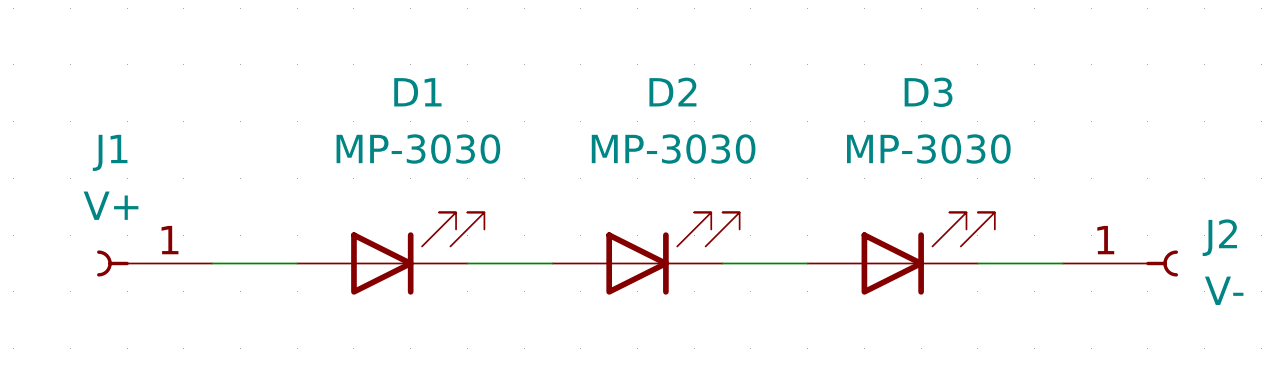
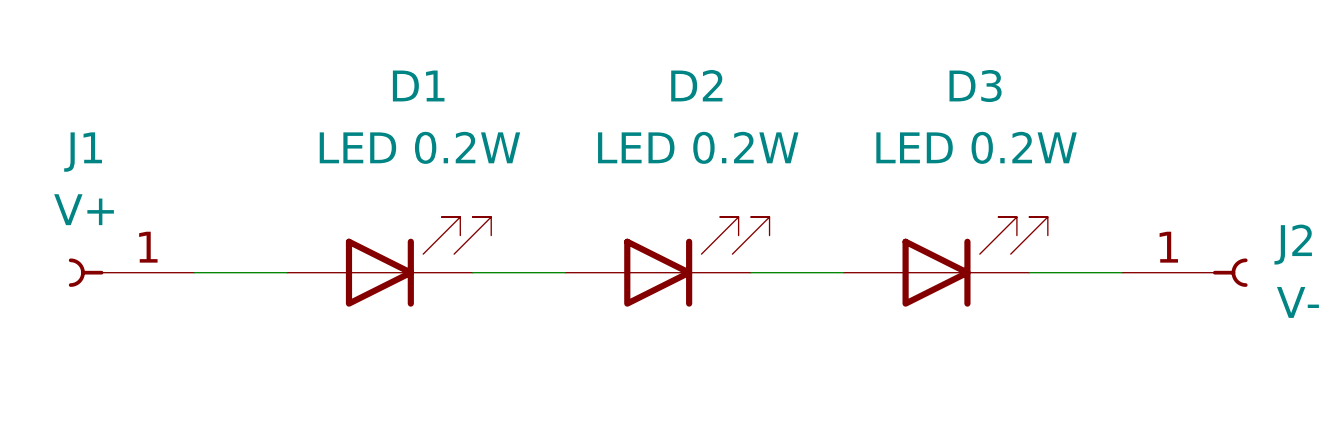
D1 value: MP-3030 (418, 149) -> LED 0.2W (419, 147)
D2 value: MP-3030 (673, 149) -> LED 0.2W (698, 147)
D3 value: MP-3030 (928, 149) -> LED 0.2W (976, 147)

